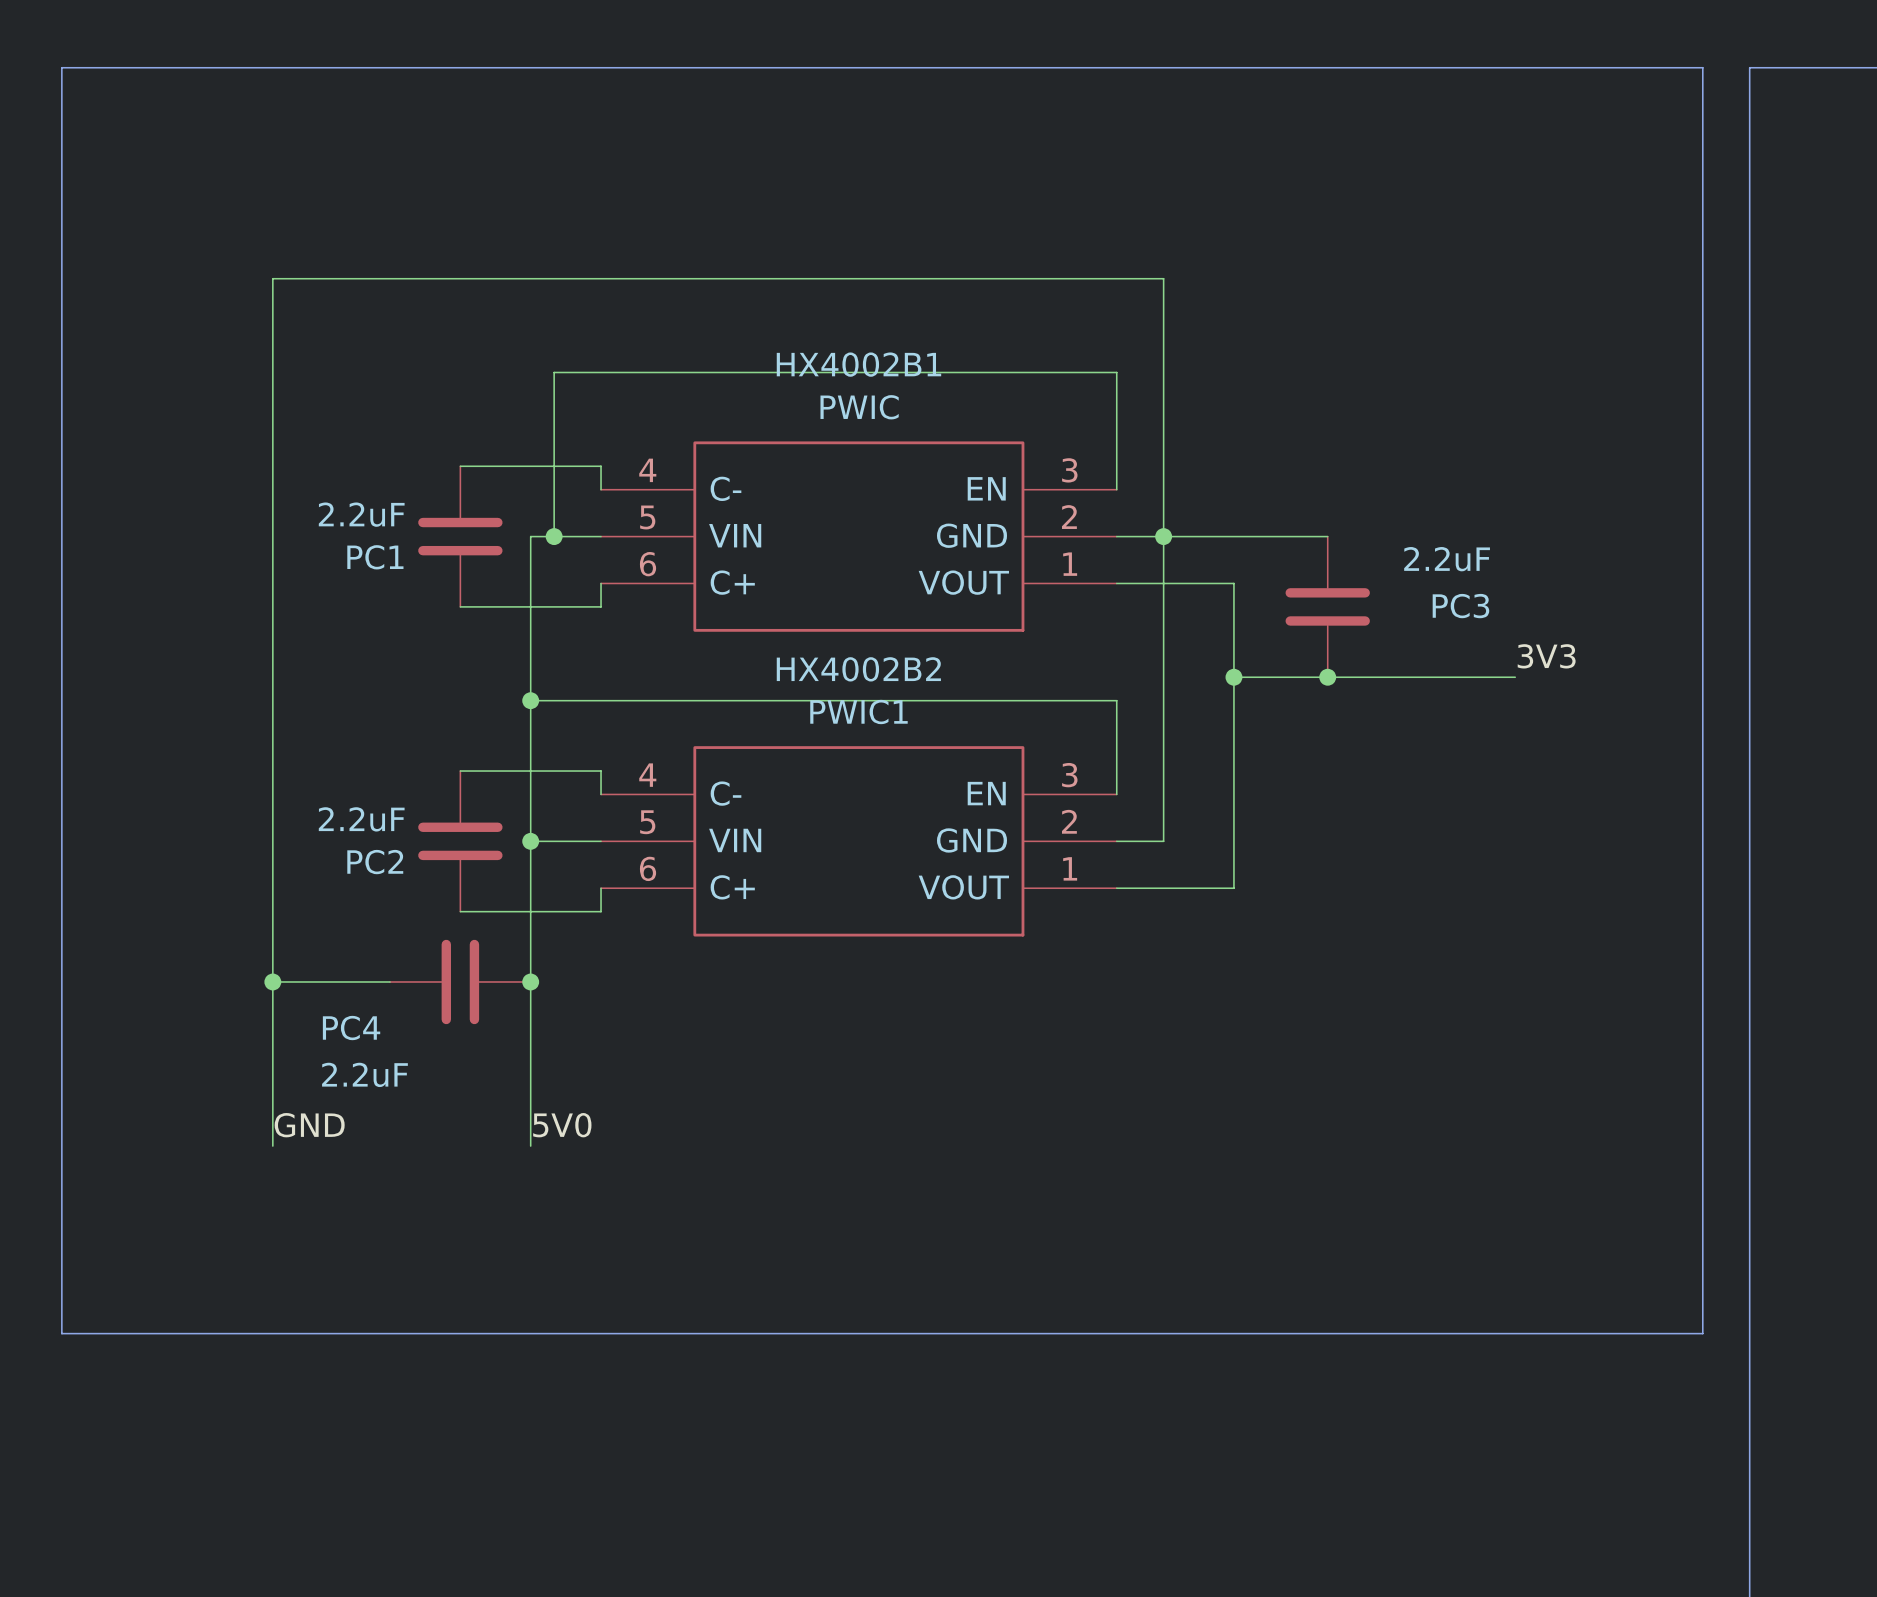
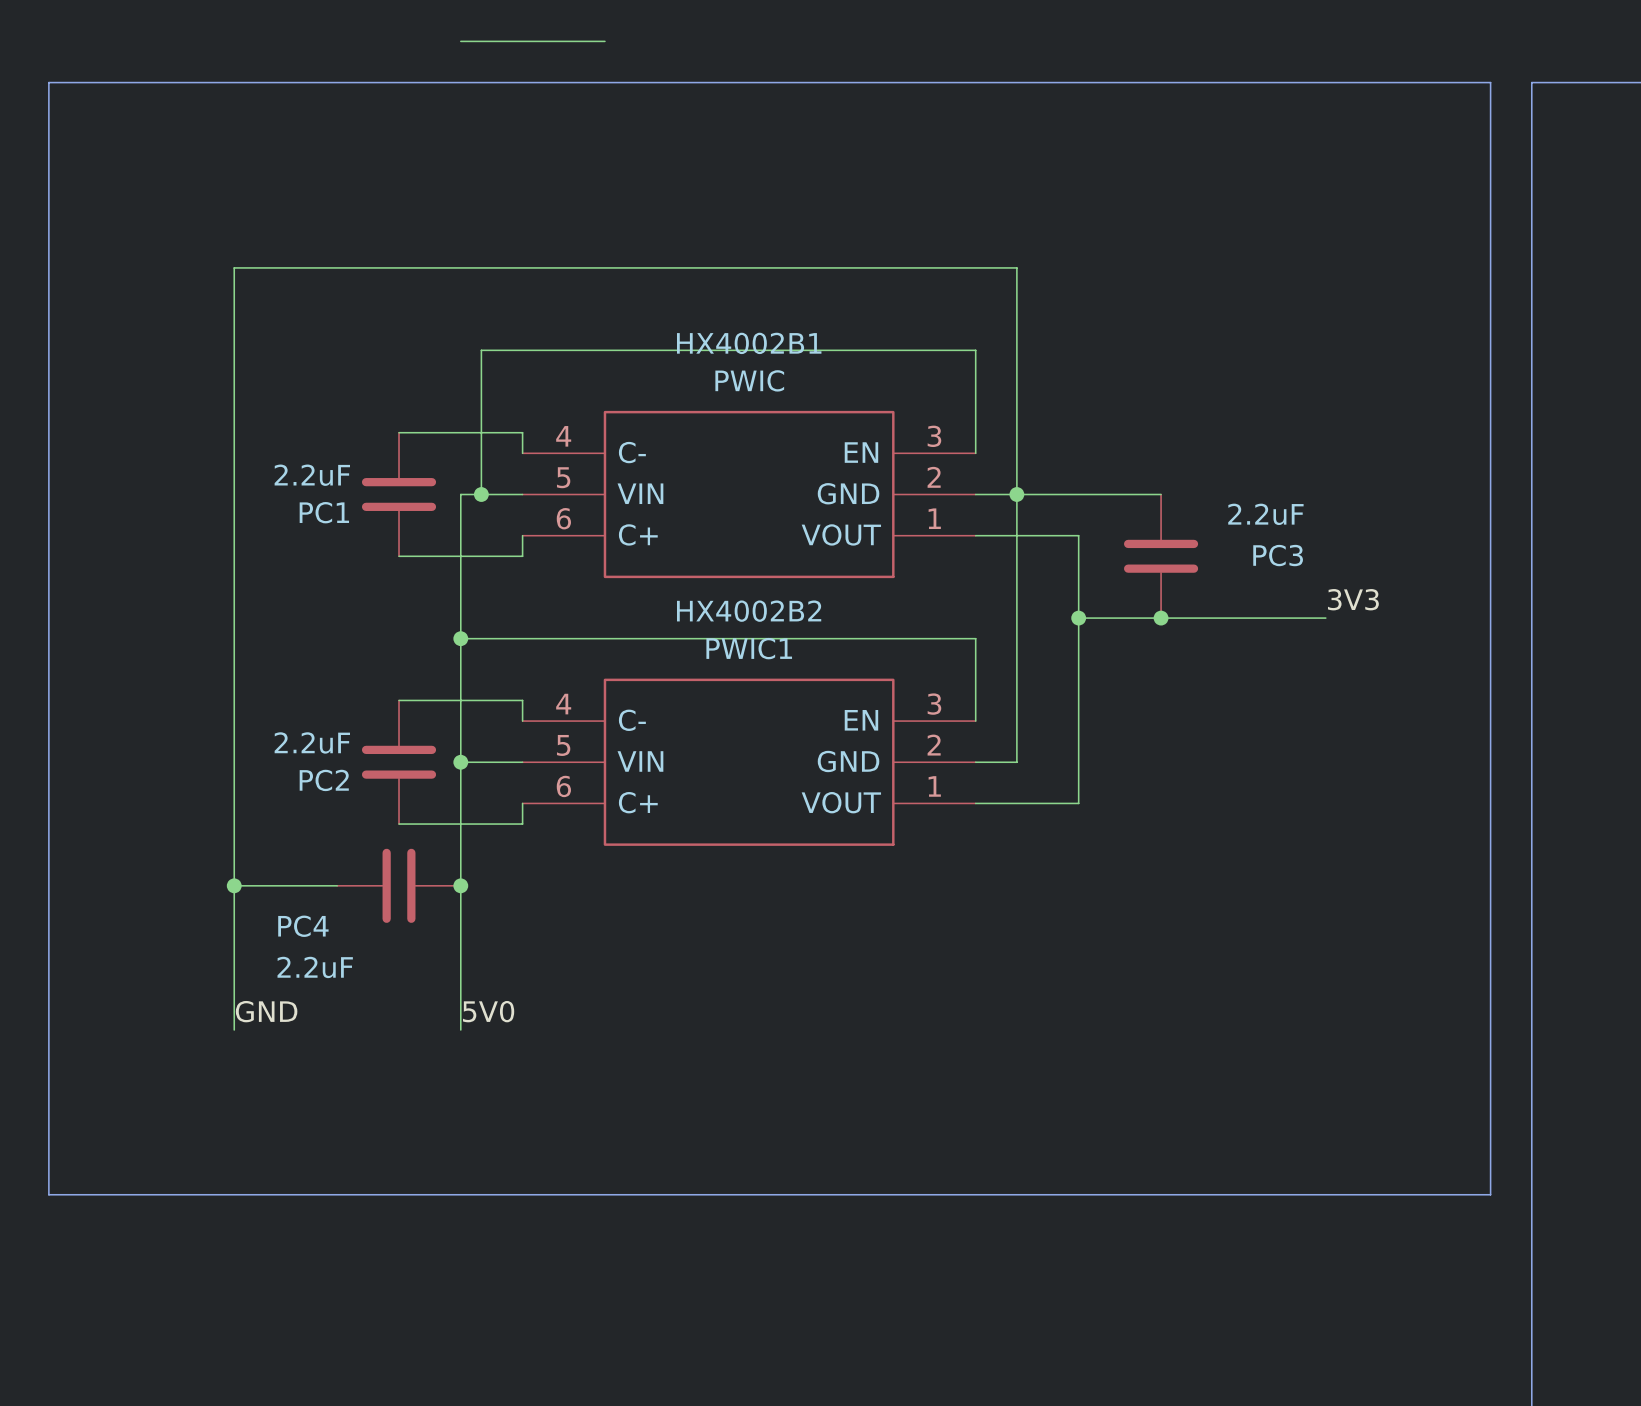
wire: none -> (460, 41) (604, 41)

